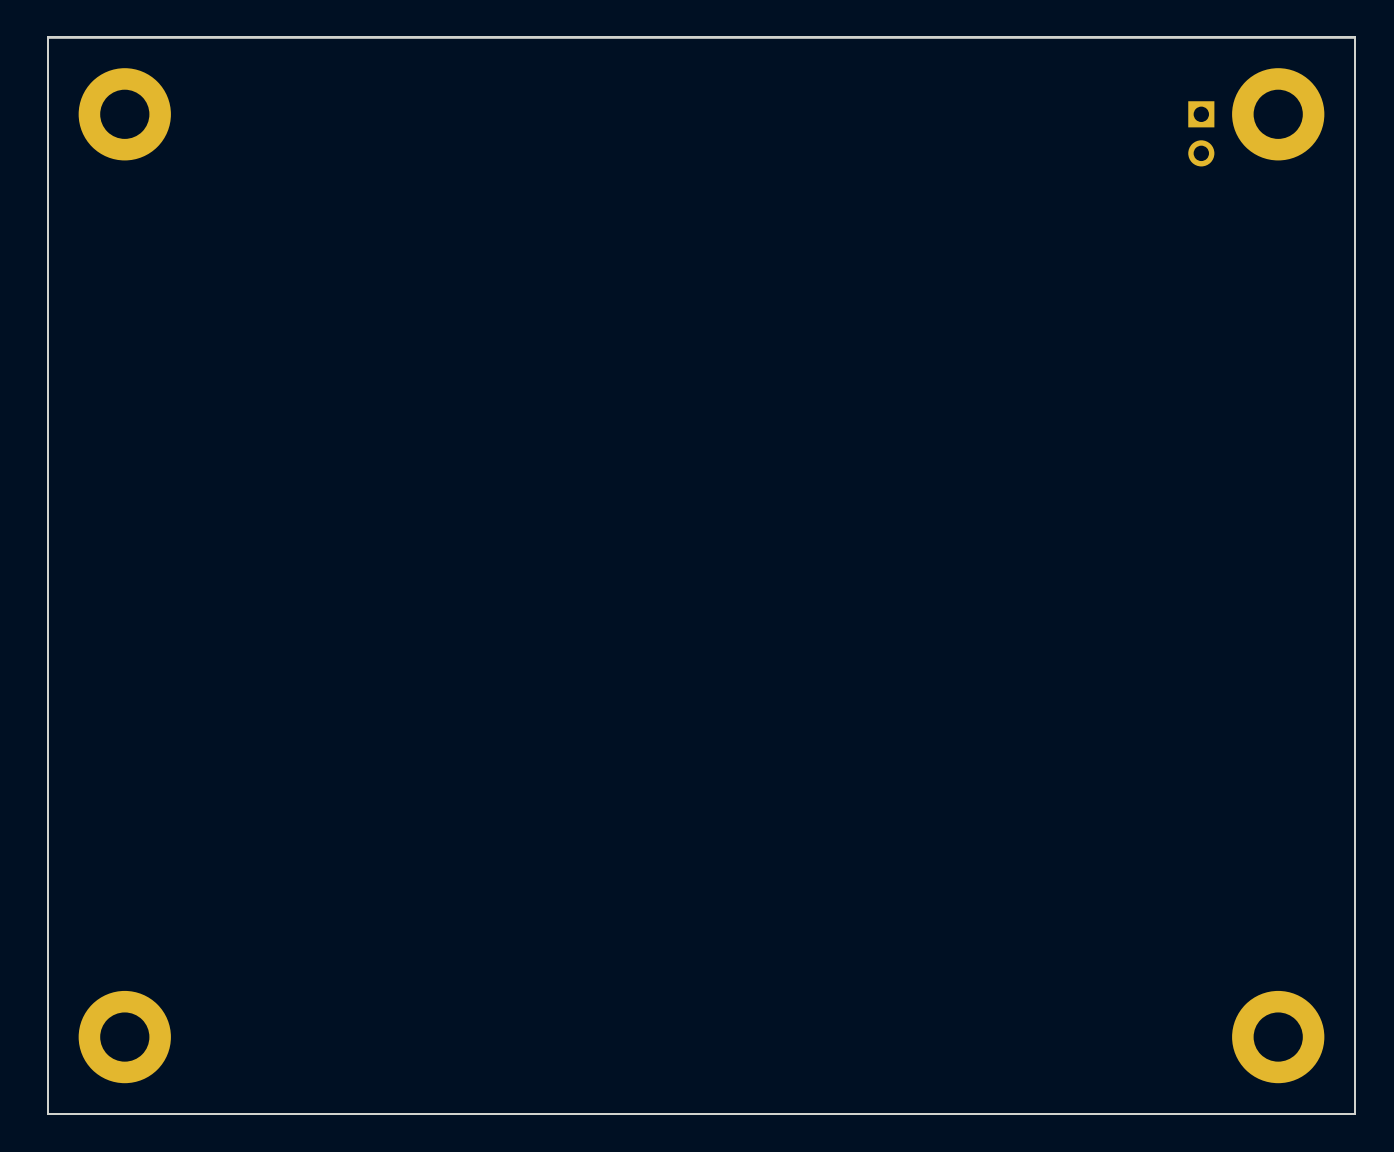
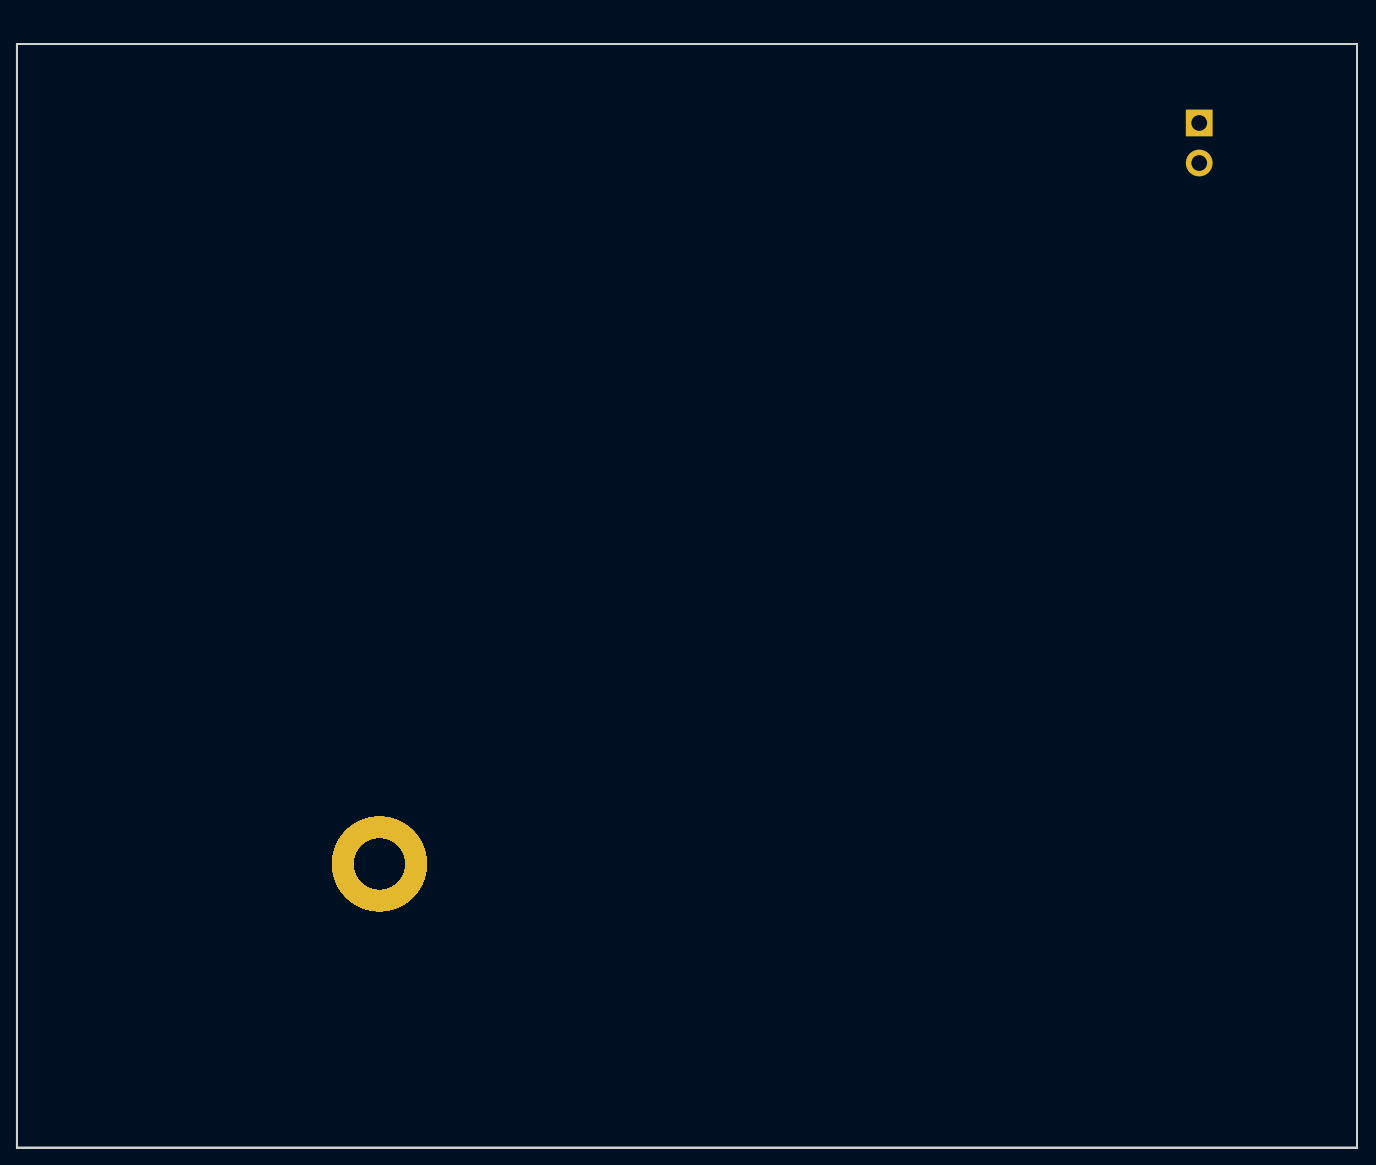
part: (124, 114) -> none
part: (1278, 114) -> none
part position: (124, 1037) -> (379, 863)
part: (1278, 1037) -> none

